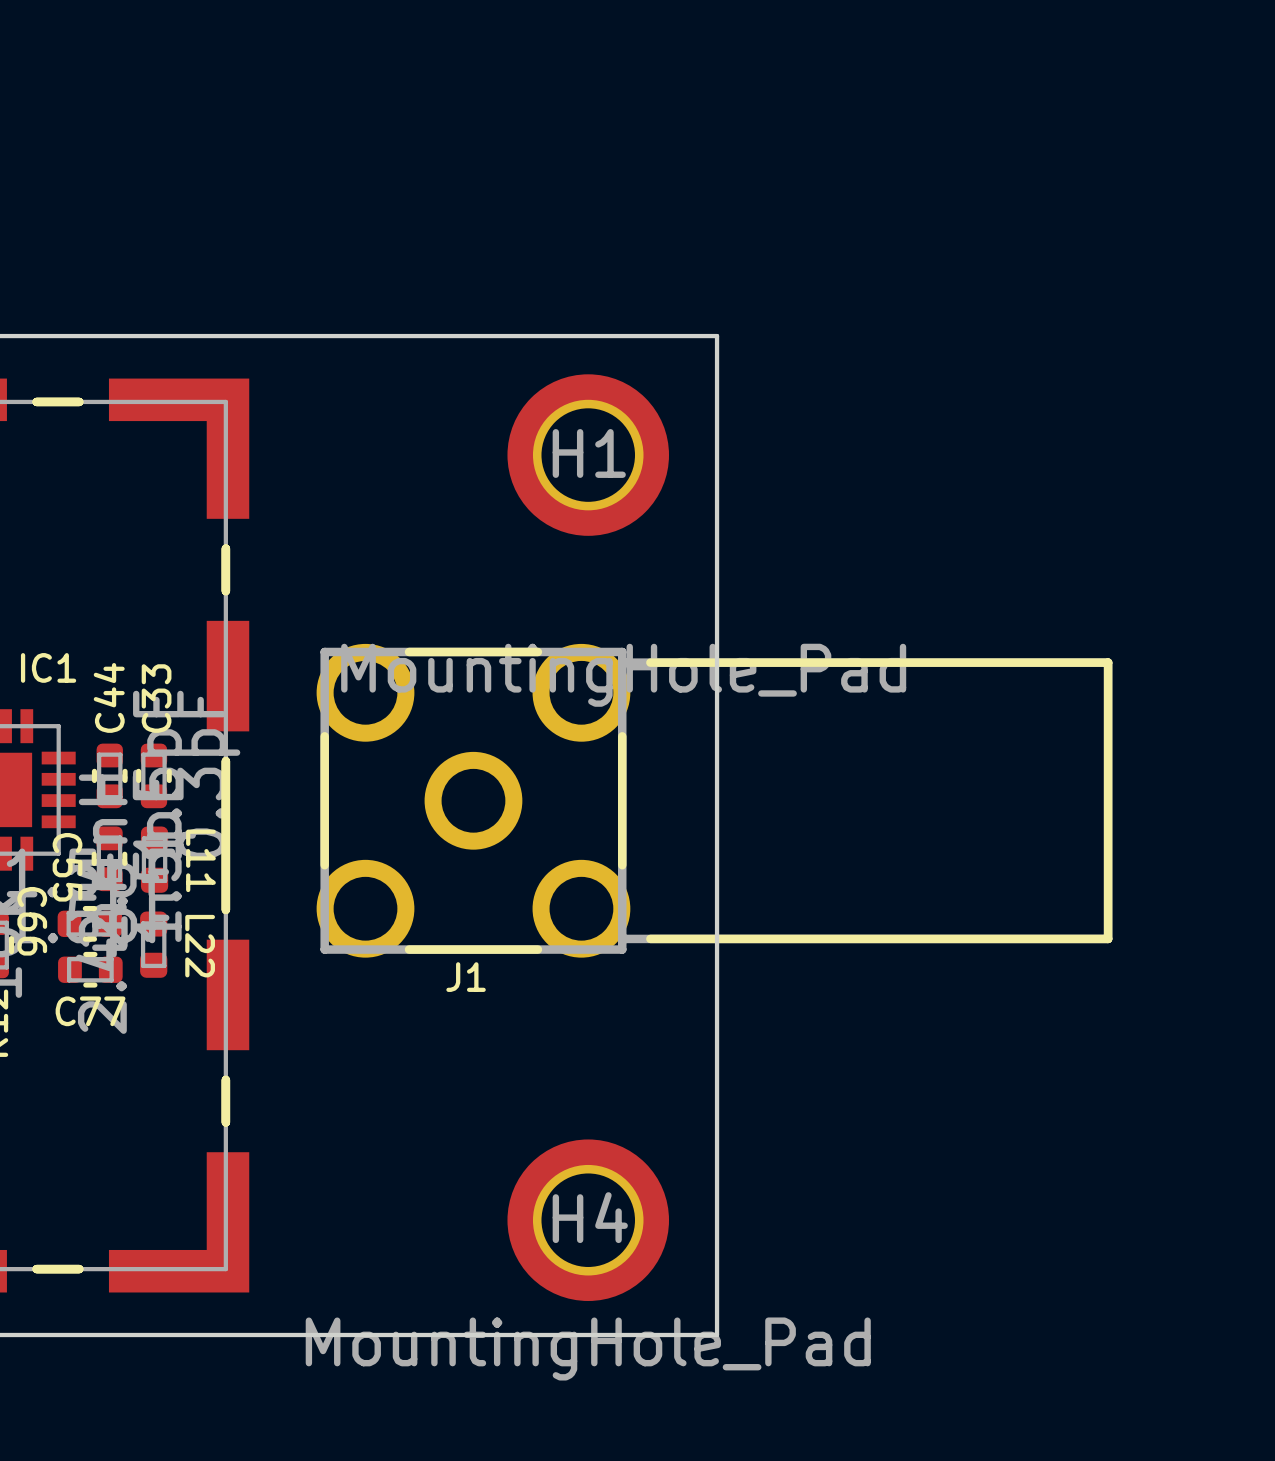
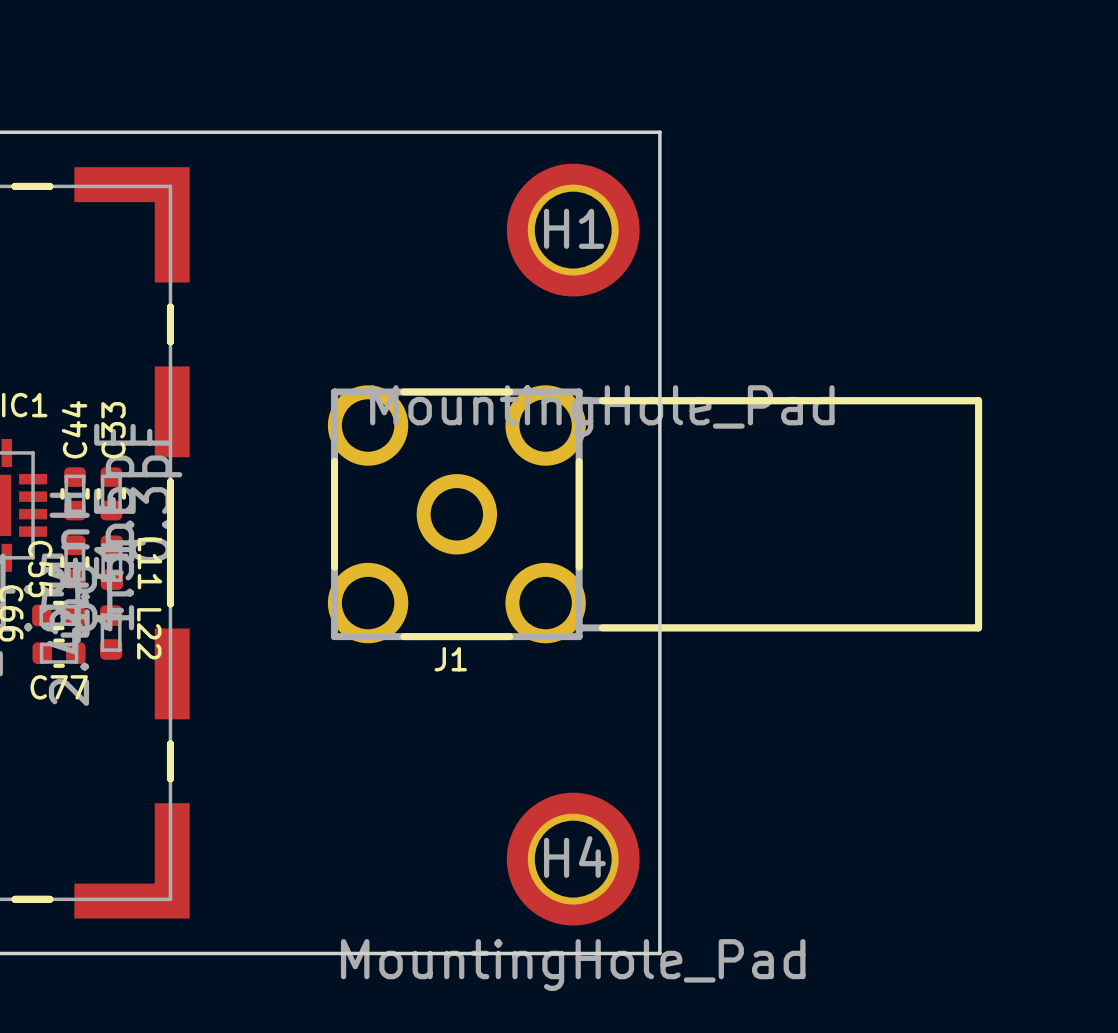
board edge: (717, 336) (717, 1334) -> (574, 132) (659, 132) (659, 953) (574, 953)
H1 position: (588, 455) -> (573, 230)
J1 position: (714, 800) -> (654, 514)
H4 position: (588, 1220) -> (573, 859)

